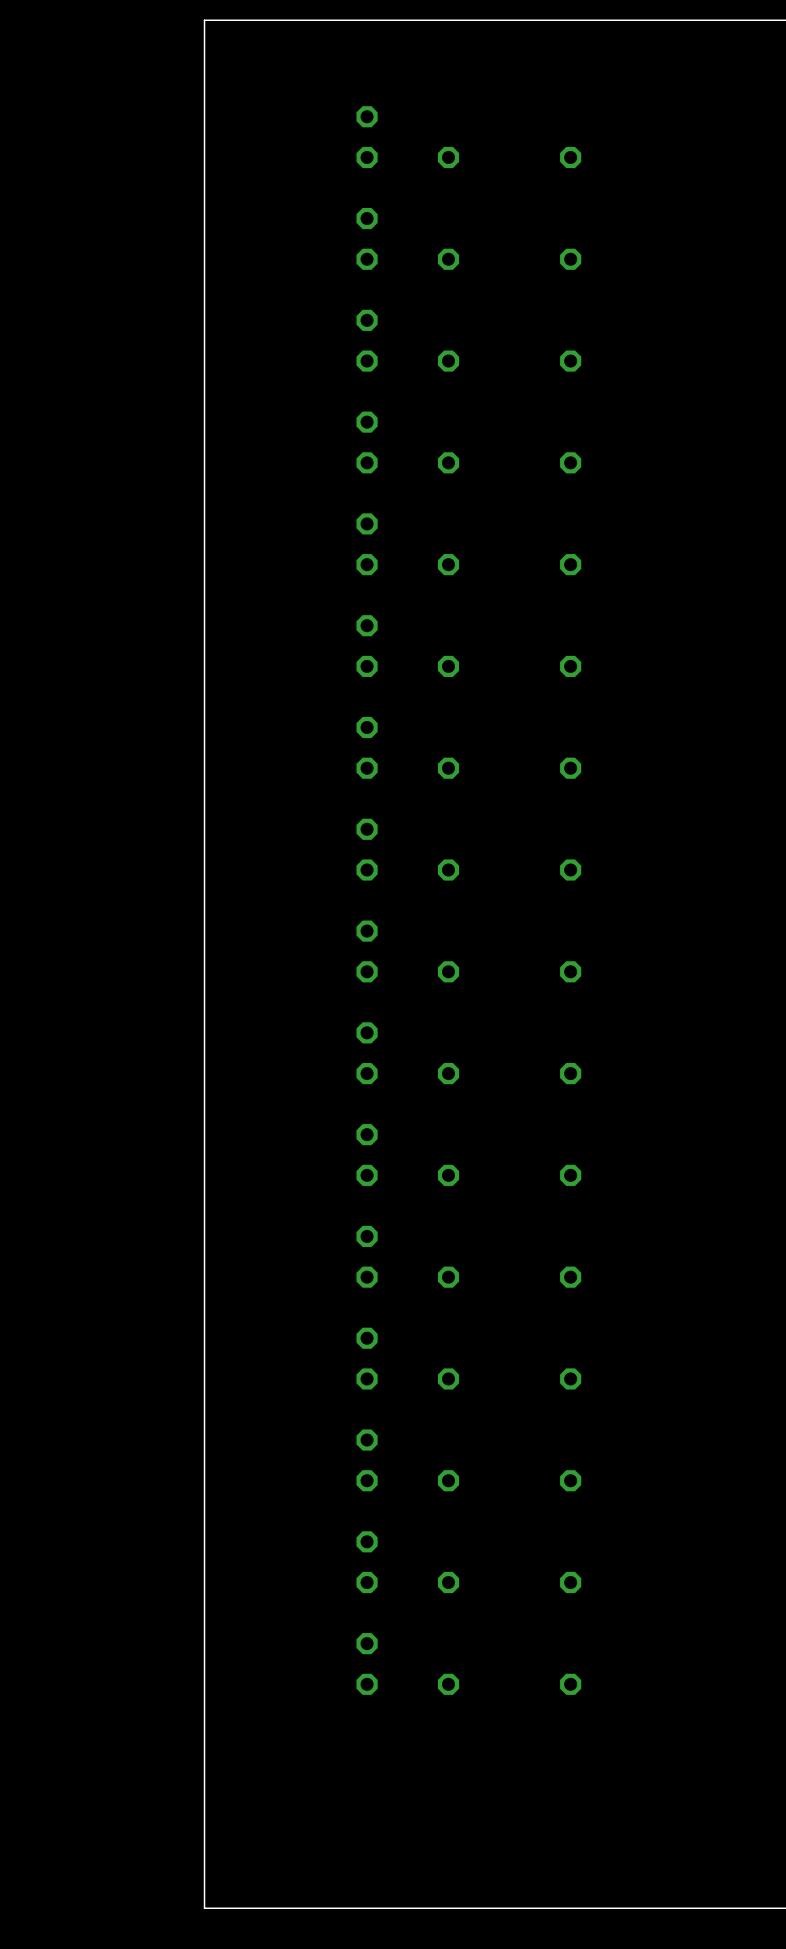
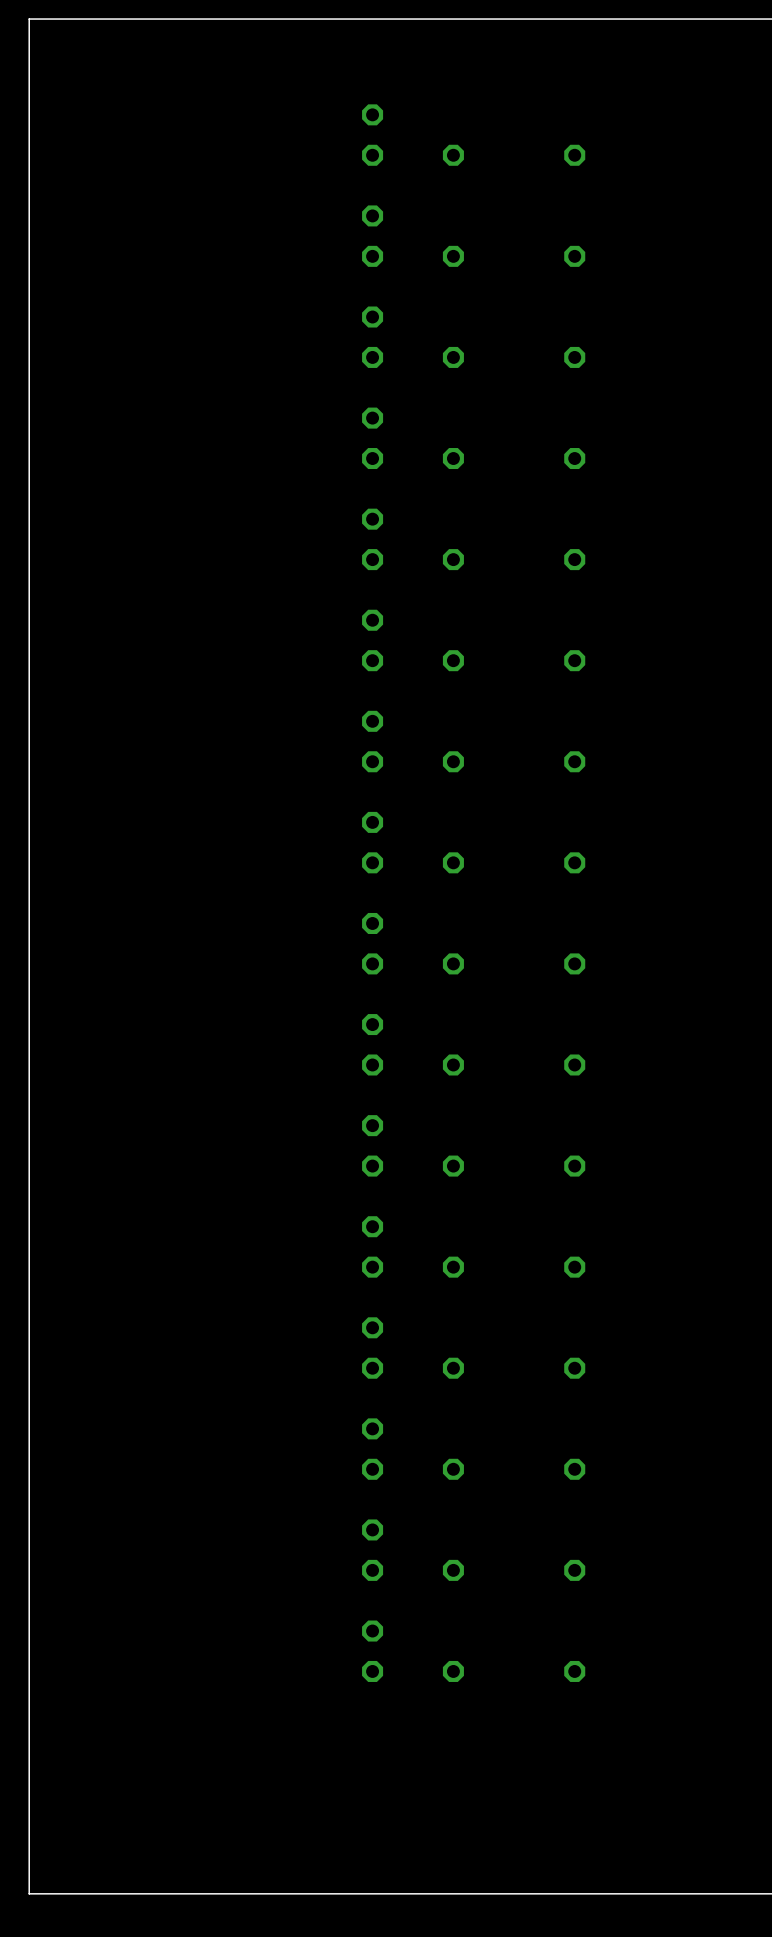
board edge: (204, 20) (204, 1908) -> (211, 19) (29, 19) (29, 1893) (211, 1893)

